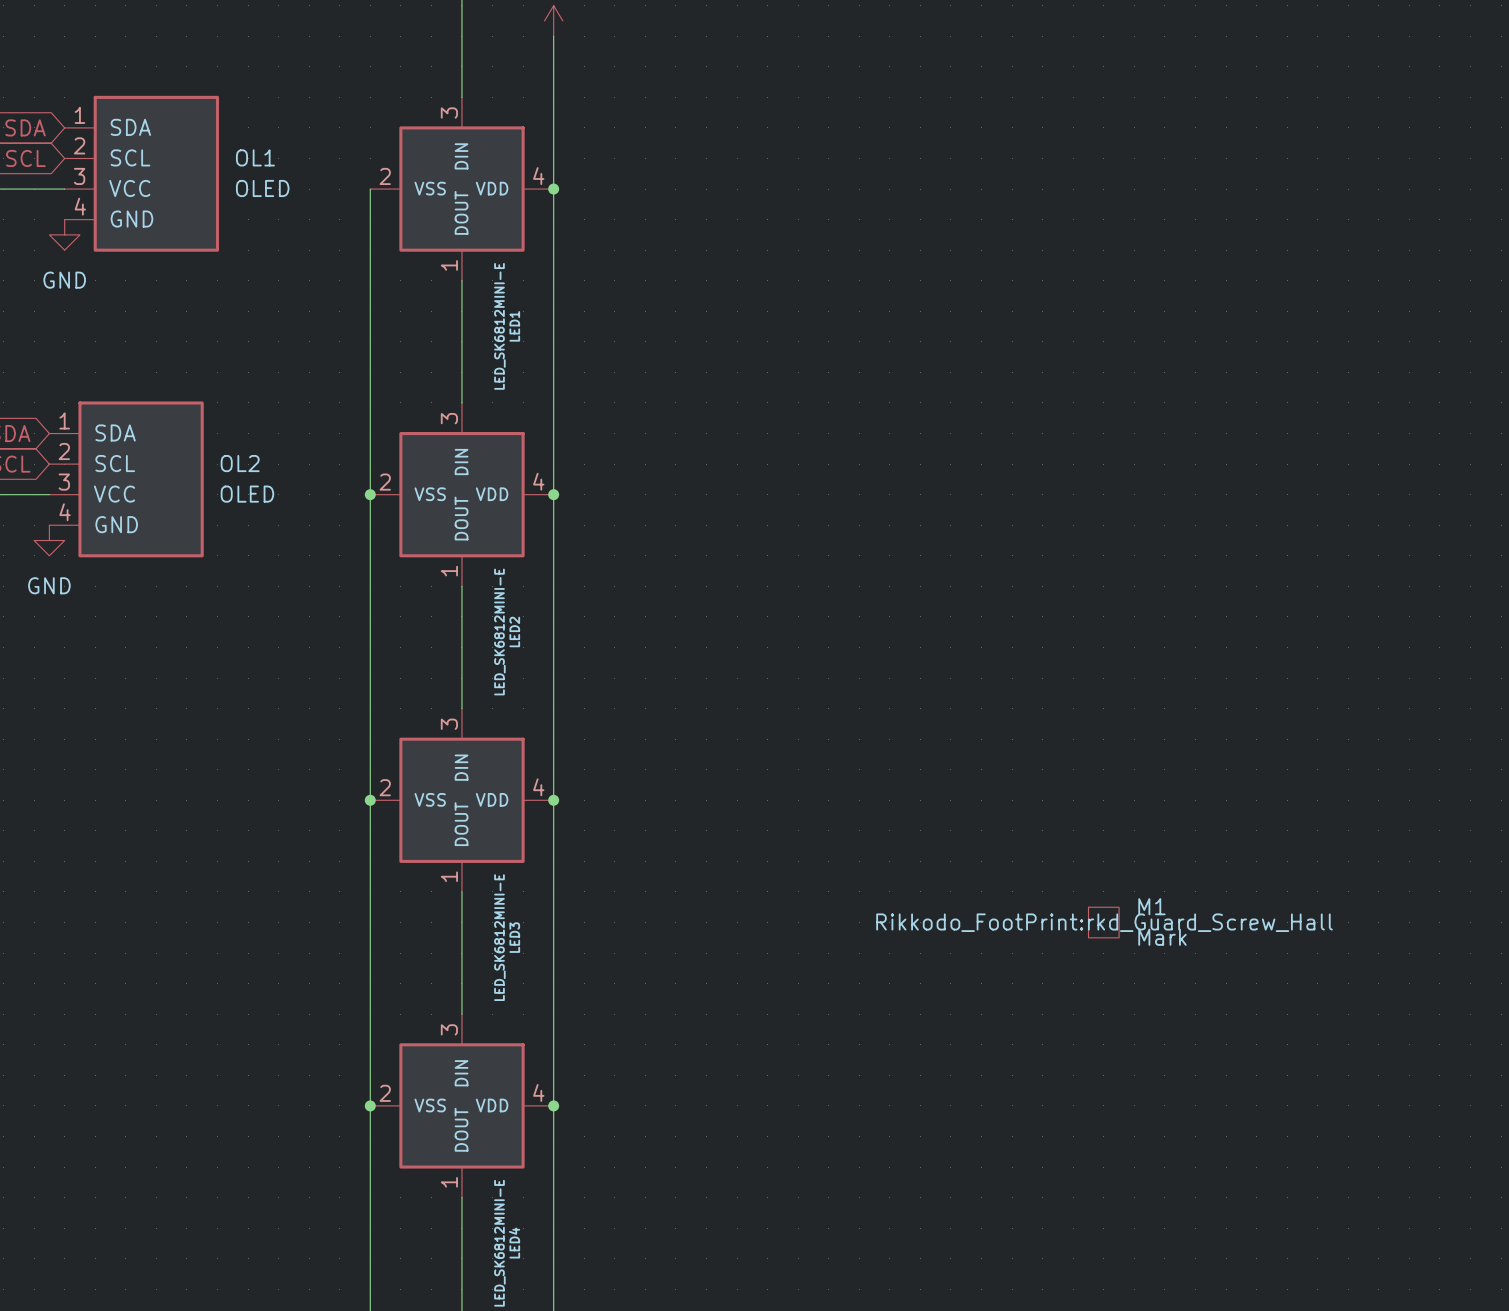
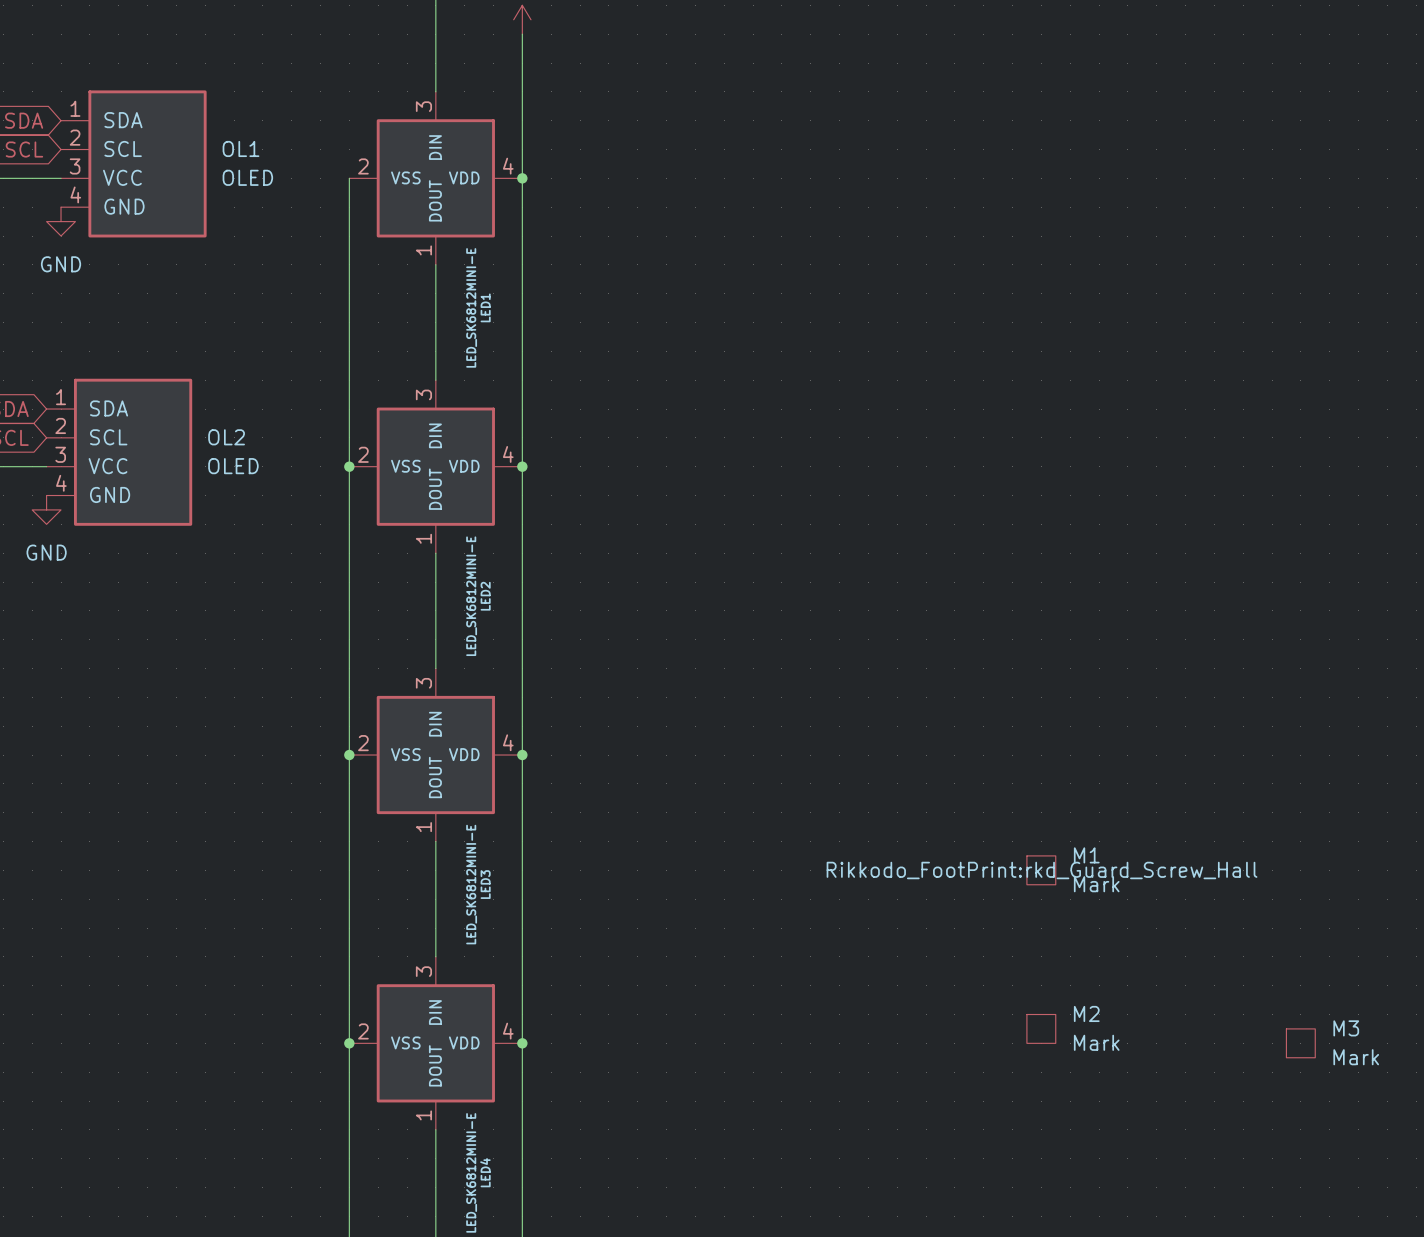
M2: none -> Mark (1041, 1028)
M3: none -> Mark (1300, 1043)

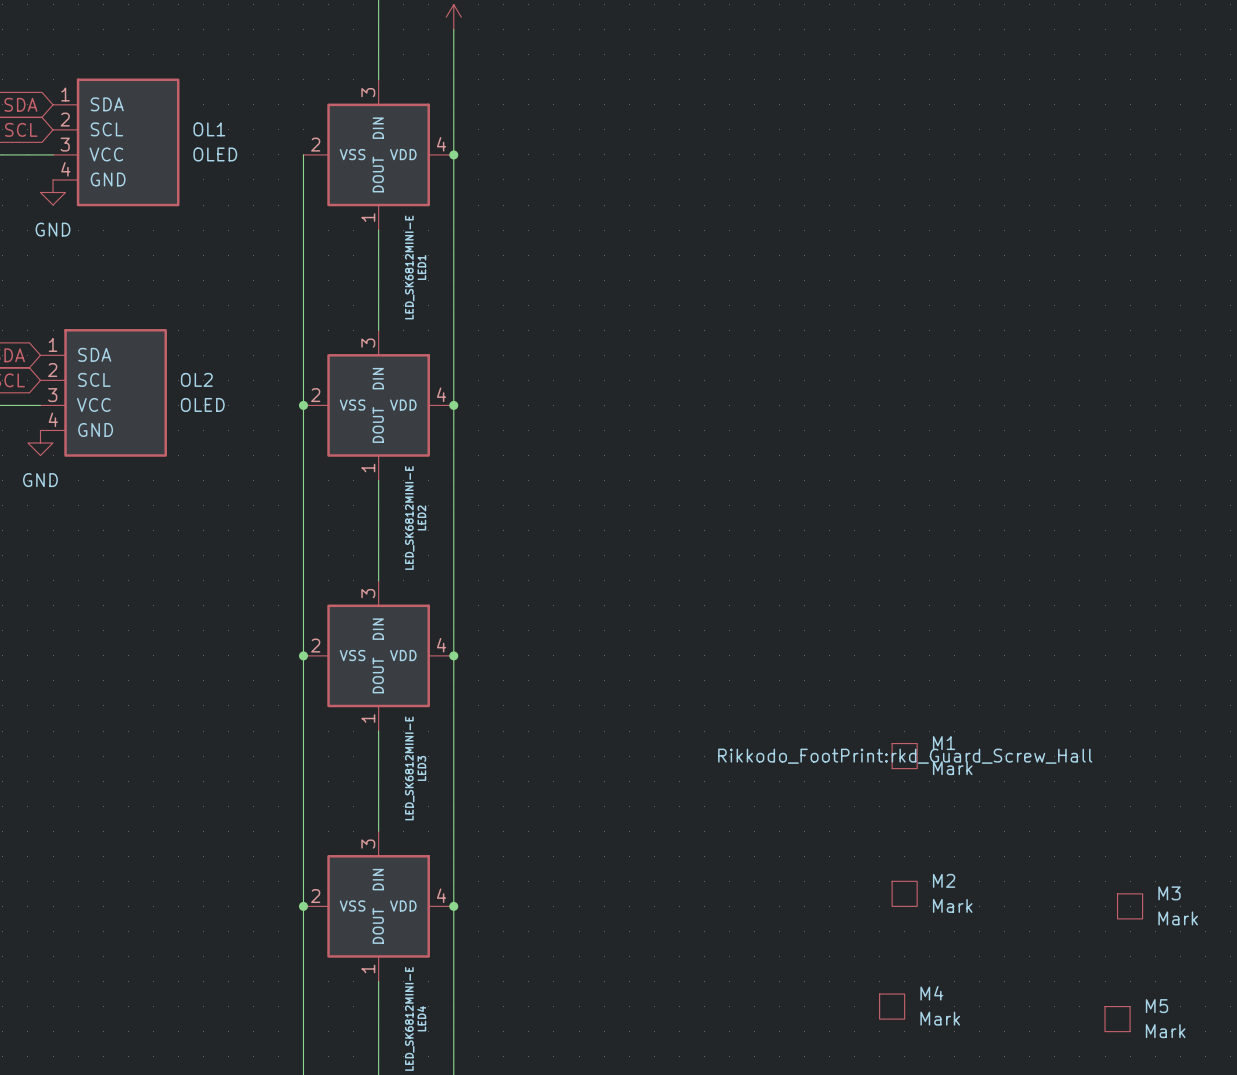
M4: none -> Mark (892, 1006)
M5: none -> Mark (1117, 1019)

